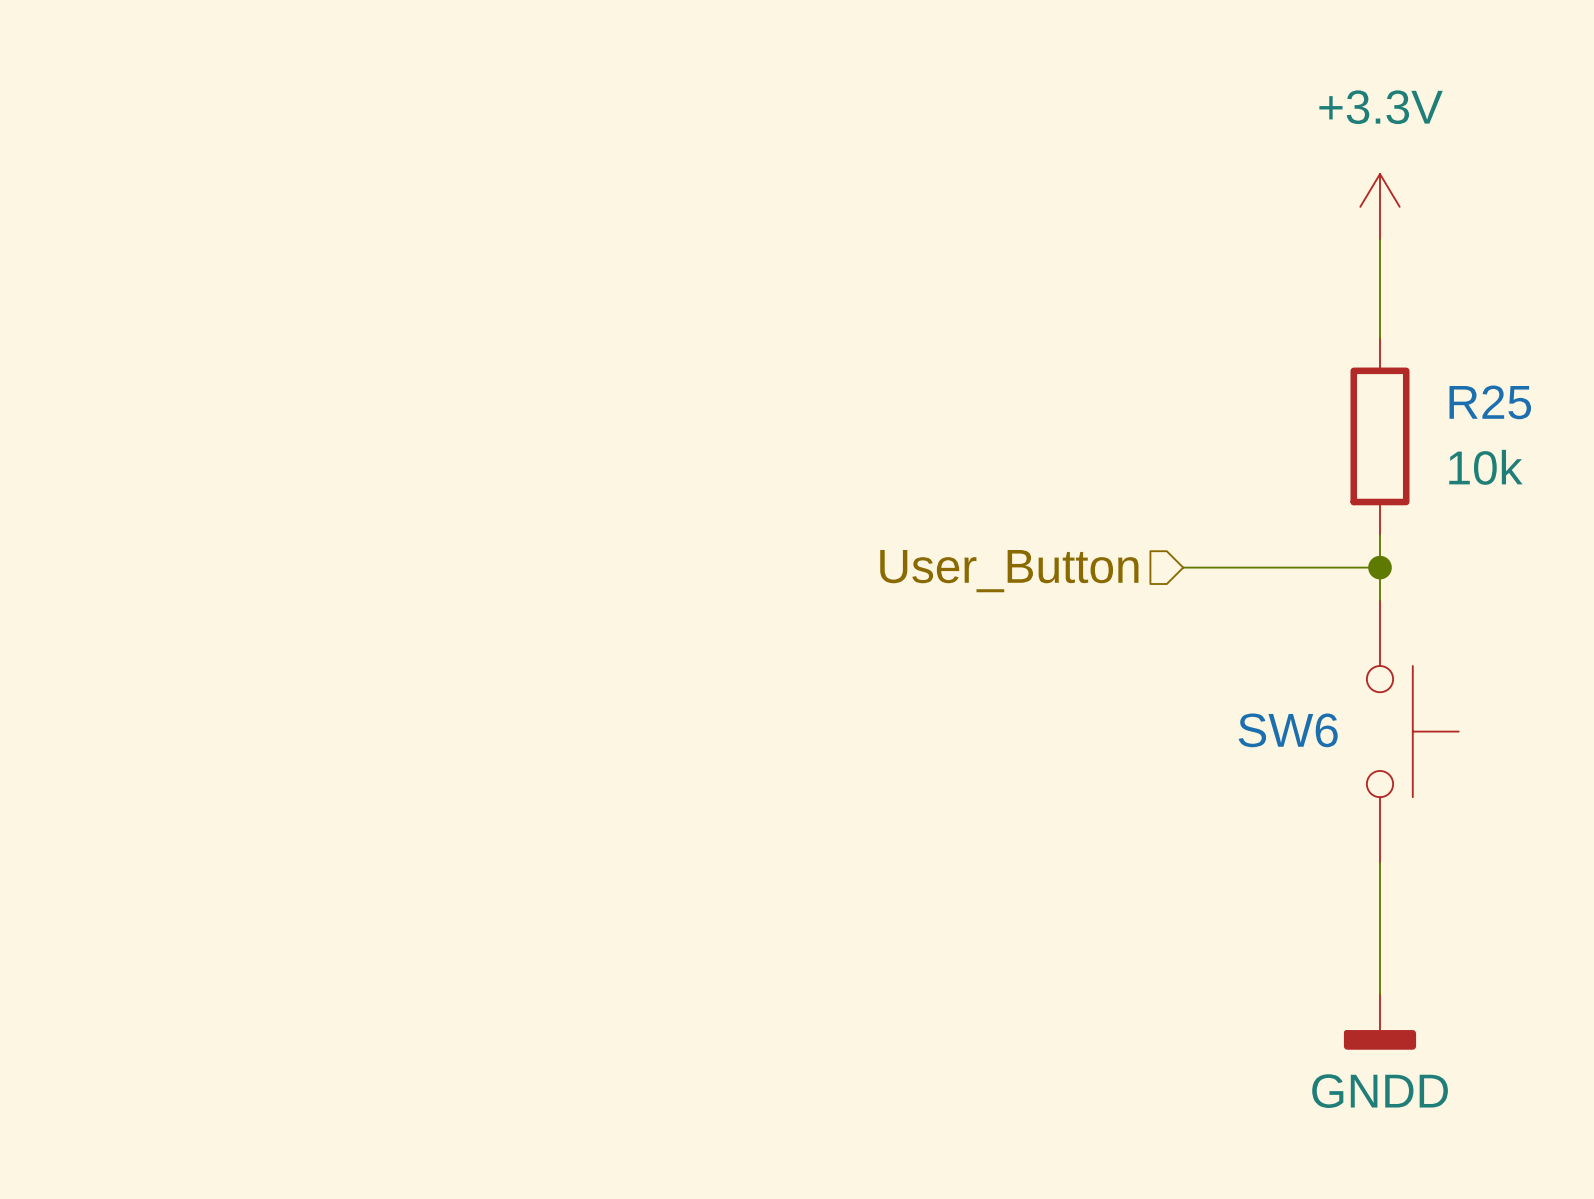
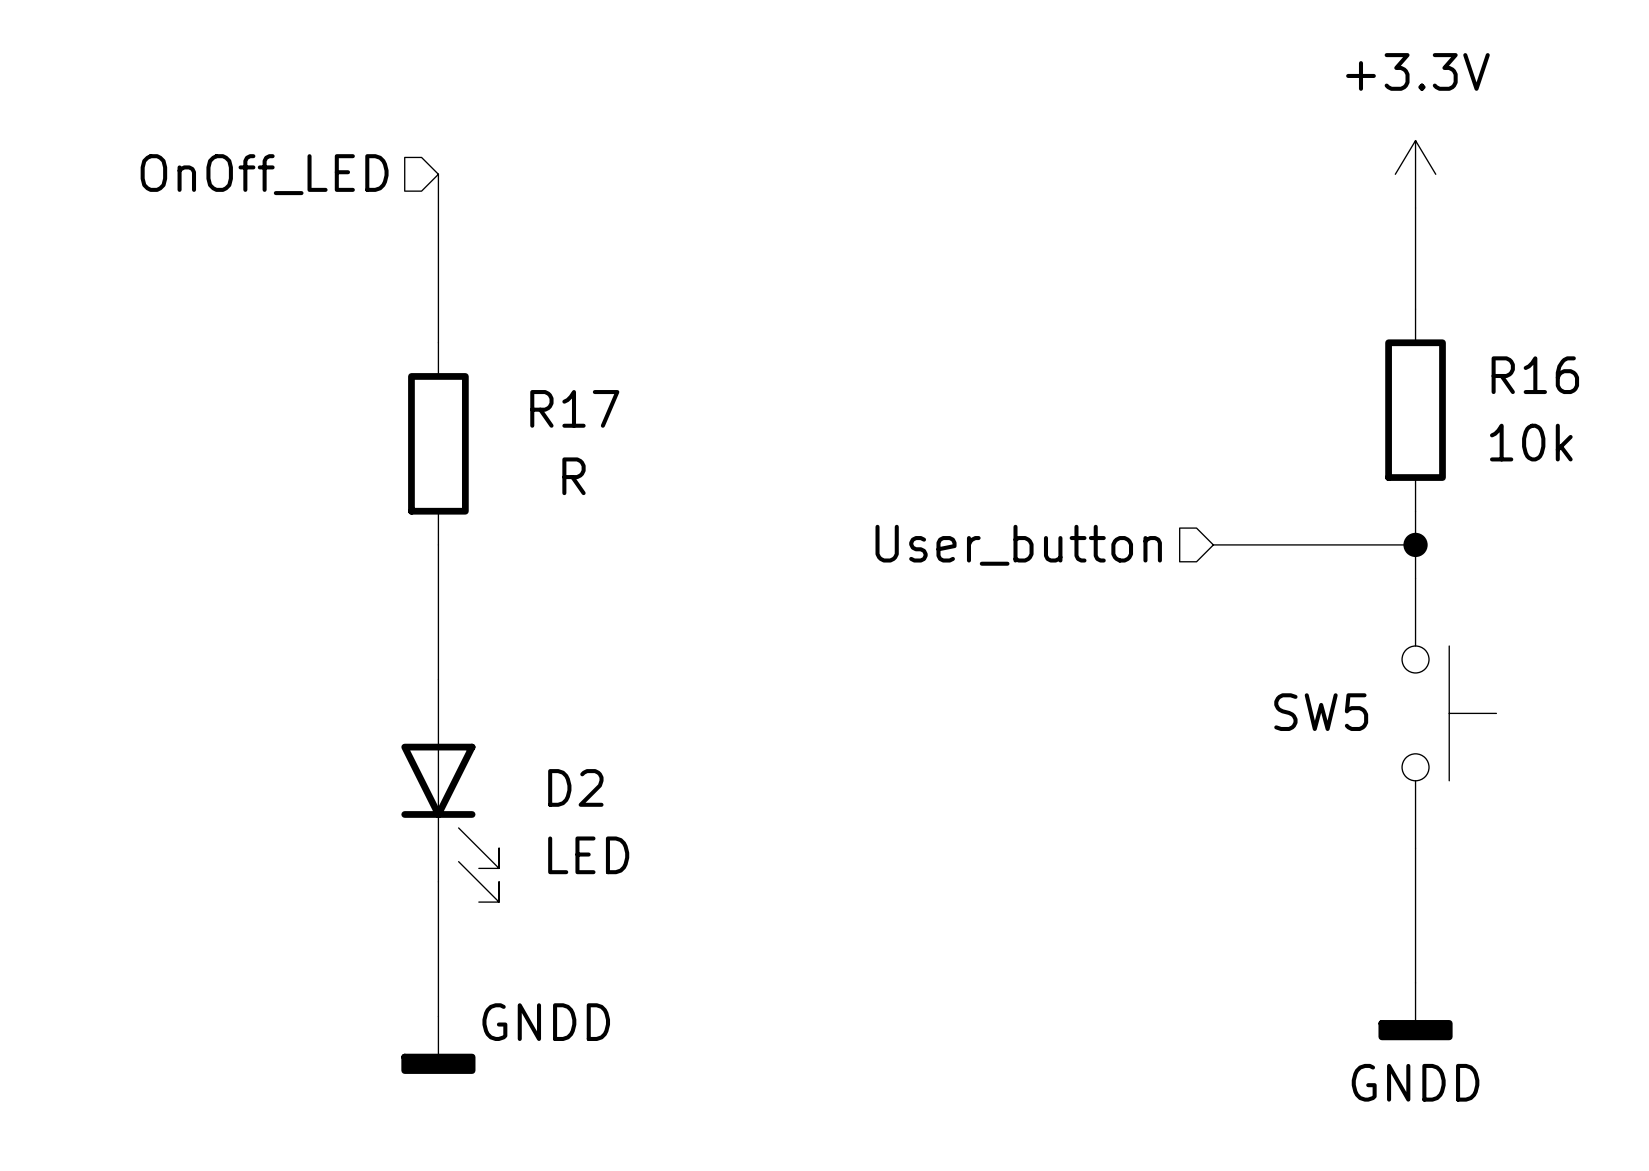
wire: none -> (438, 174) (438, 342)
hierarchical label: none -> OnOff_LED (264, 174)
R25 name: R25 (1490, 402) -> R16 (1535, 375)
R17: none -> R (438, 443)
wire: none -> (438, 544) (438, 679)
hierarchical label: User_Button (1009, 571) -> User_button (1018, 545)
SW6 name: SW6 (1288, 730) -> SW5 (1321, 712)
D2: none -> LED (450, 790)
wire: none -> (438, 881) (438, 1016)
power symbol: none -> GNDD (438, 1045)

